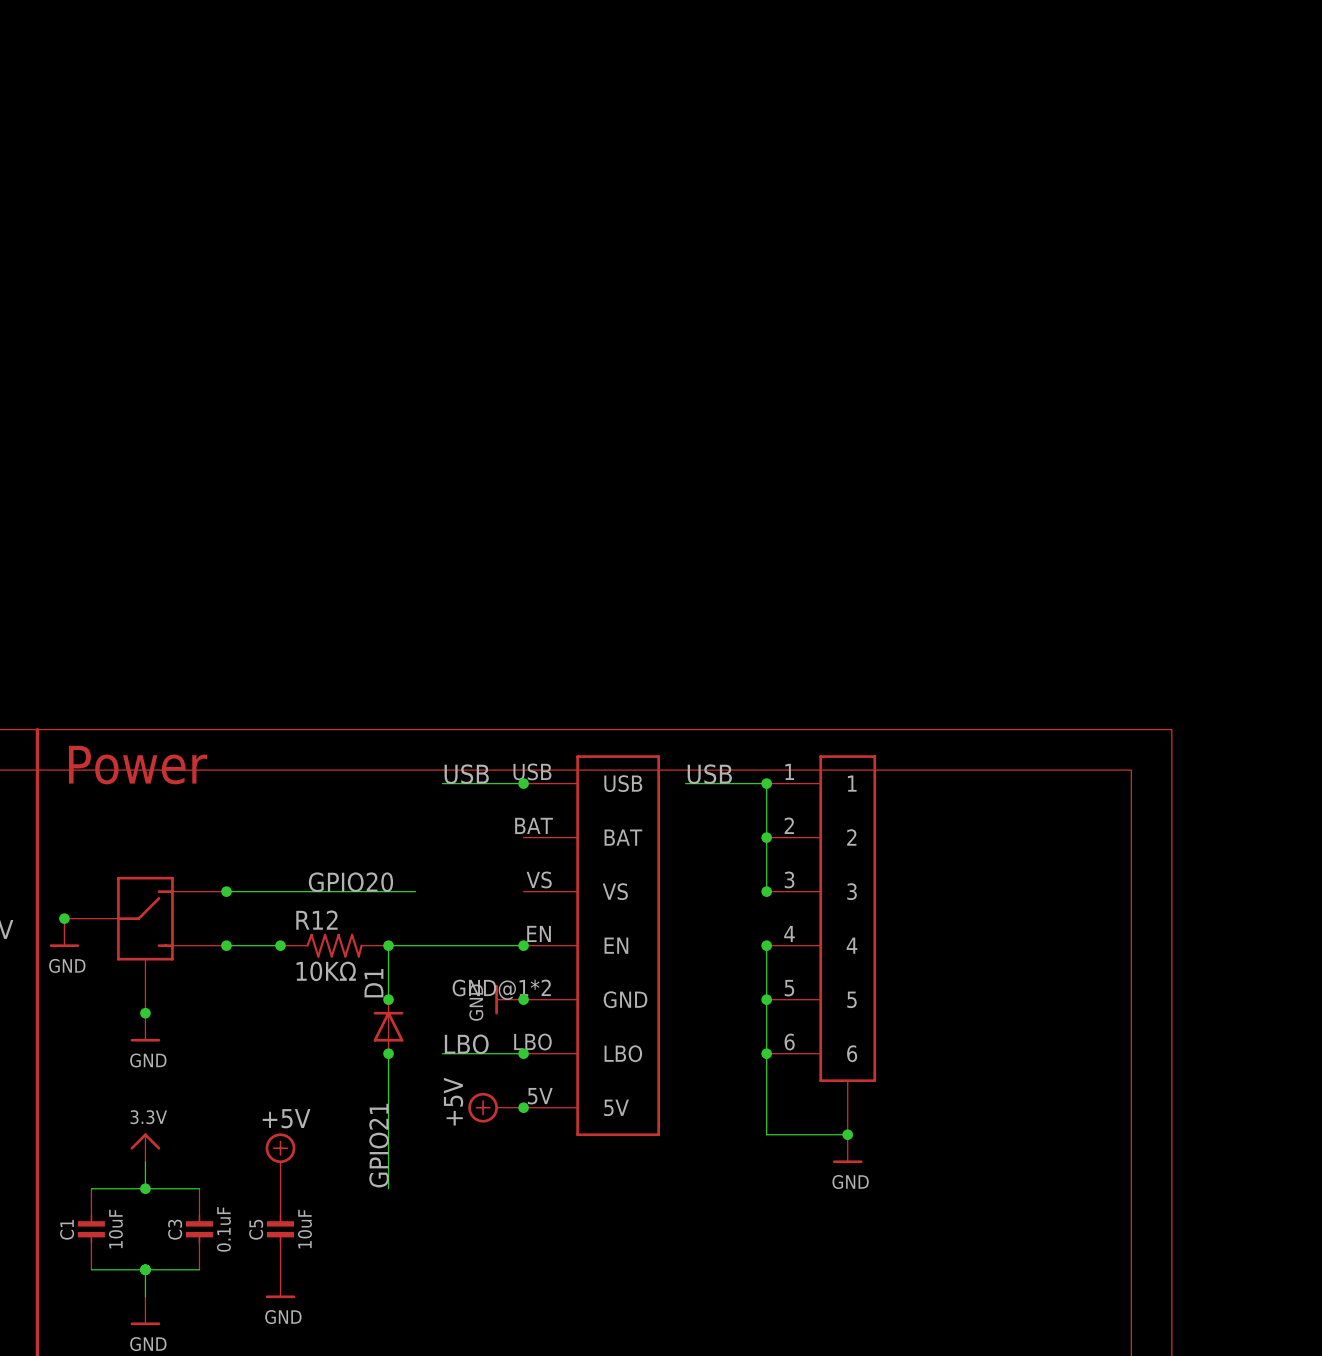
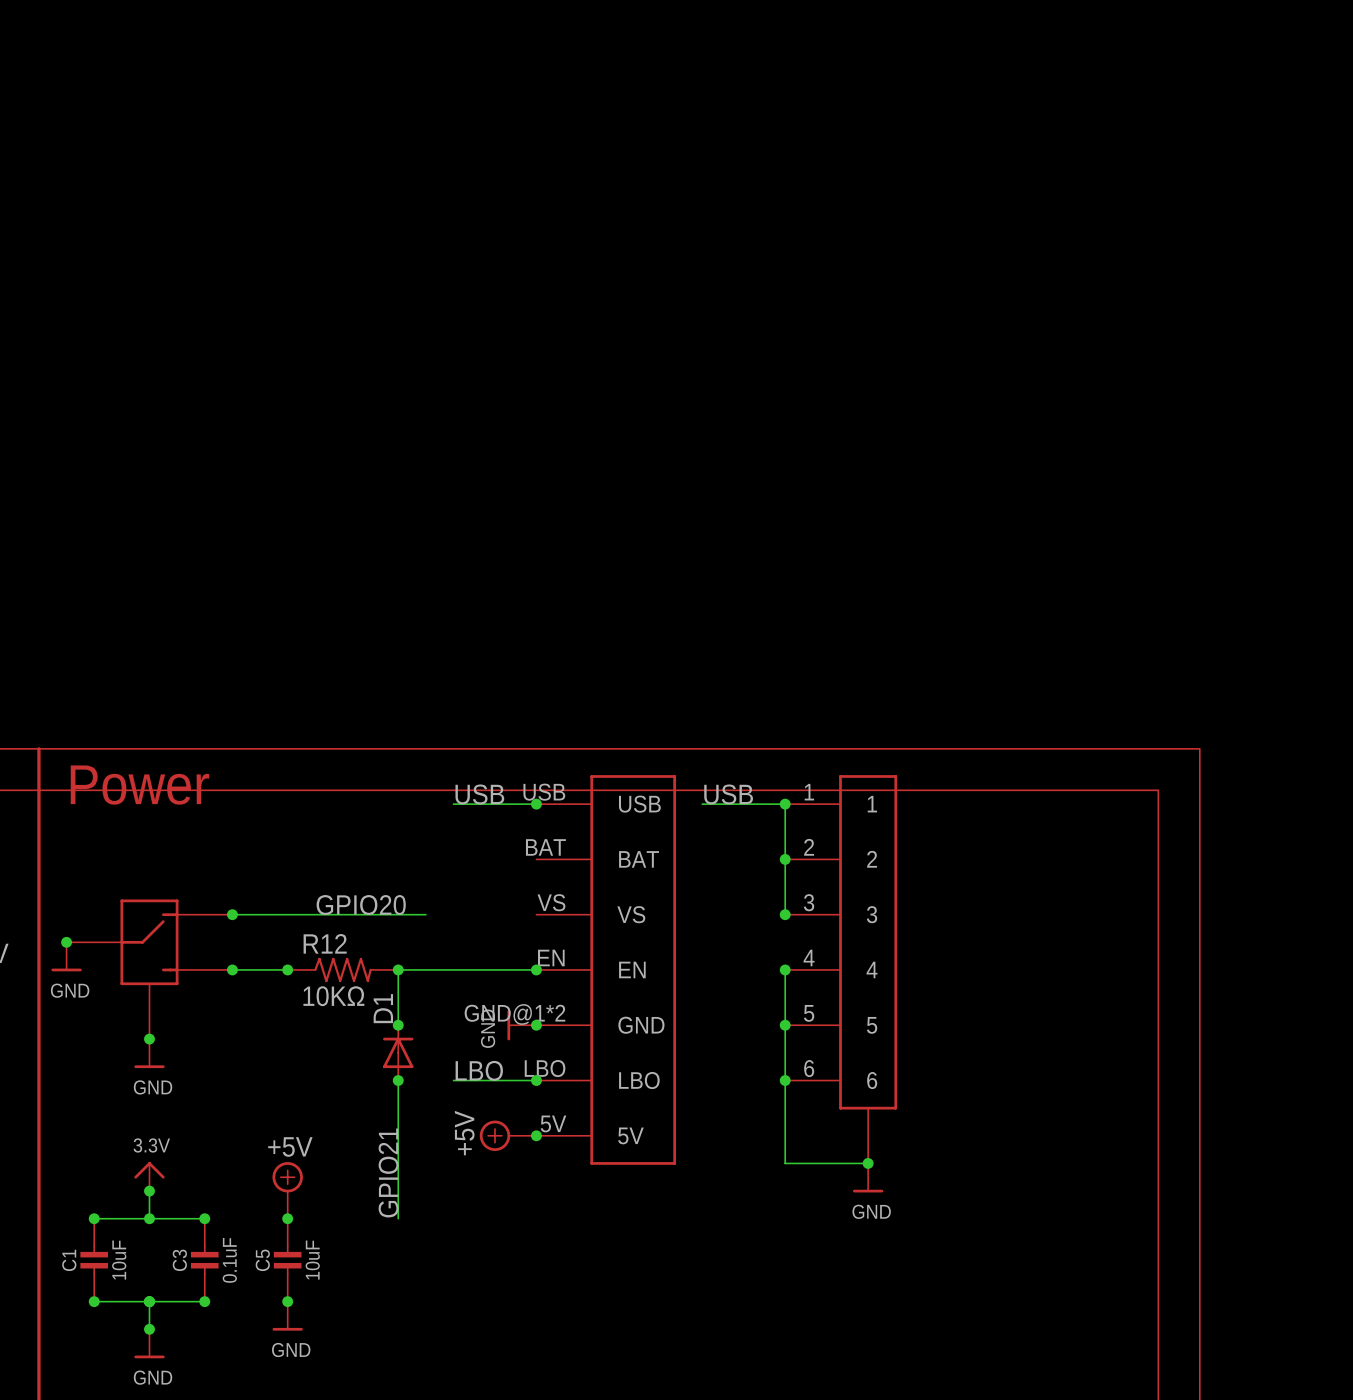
junction: none -> (149, 1191)
junction: none -> (94, 1218)
junction: none -> (204, 1218)
junction: none -> (287, 1218)
junction: none -> (94, 1301)
junction: none -> (204, 1301)
junction: none -> (287, 1301)
junction: none -> (149, 1329)

